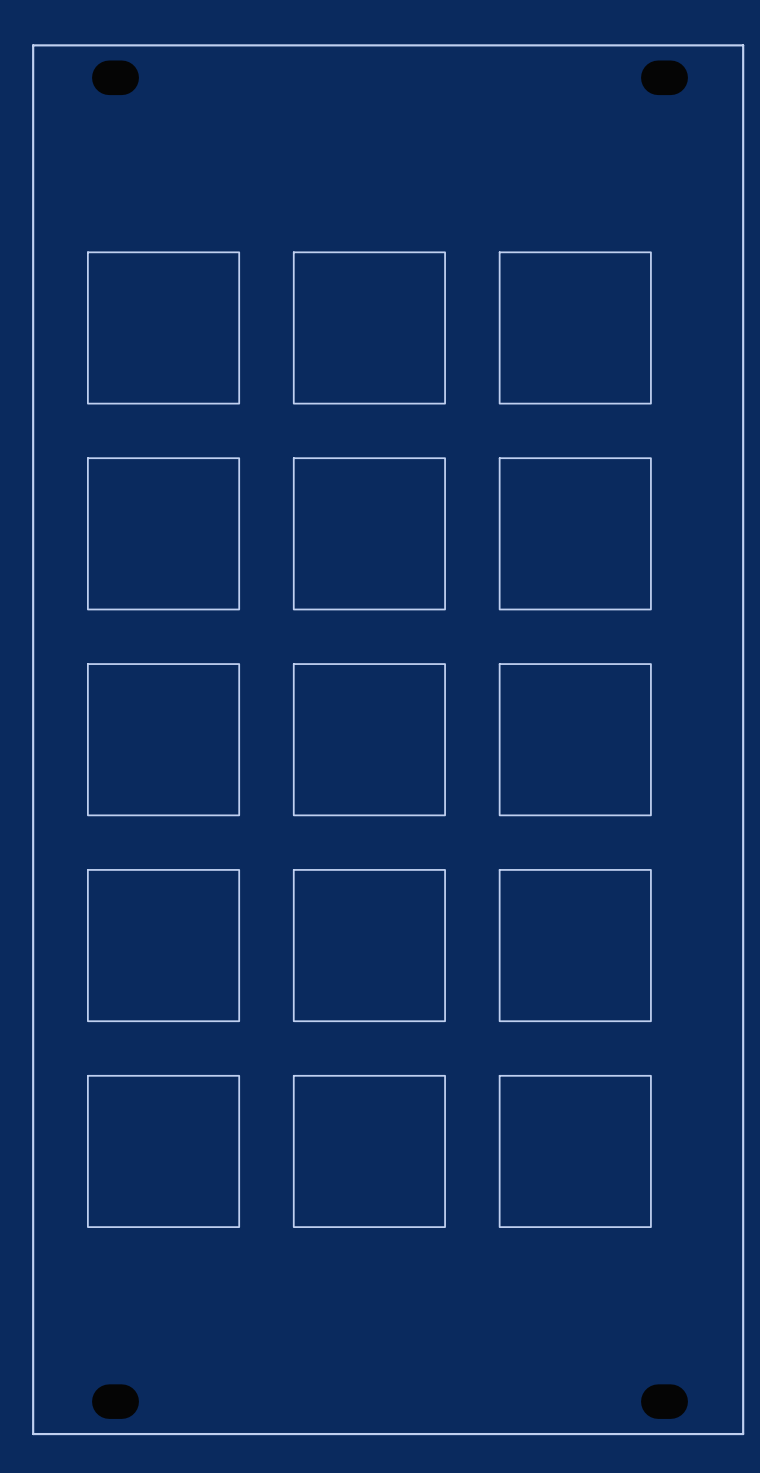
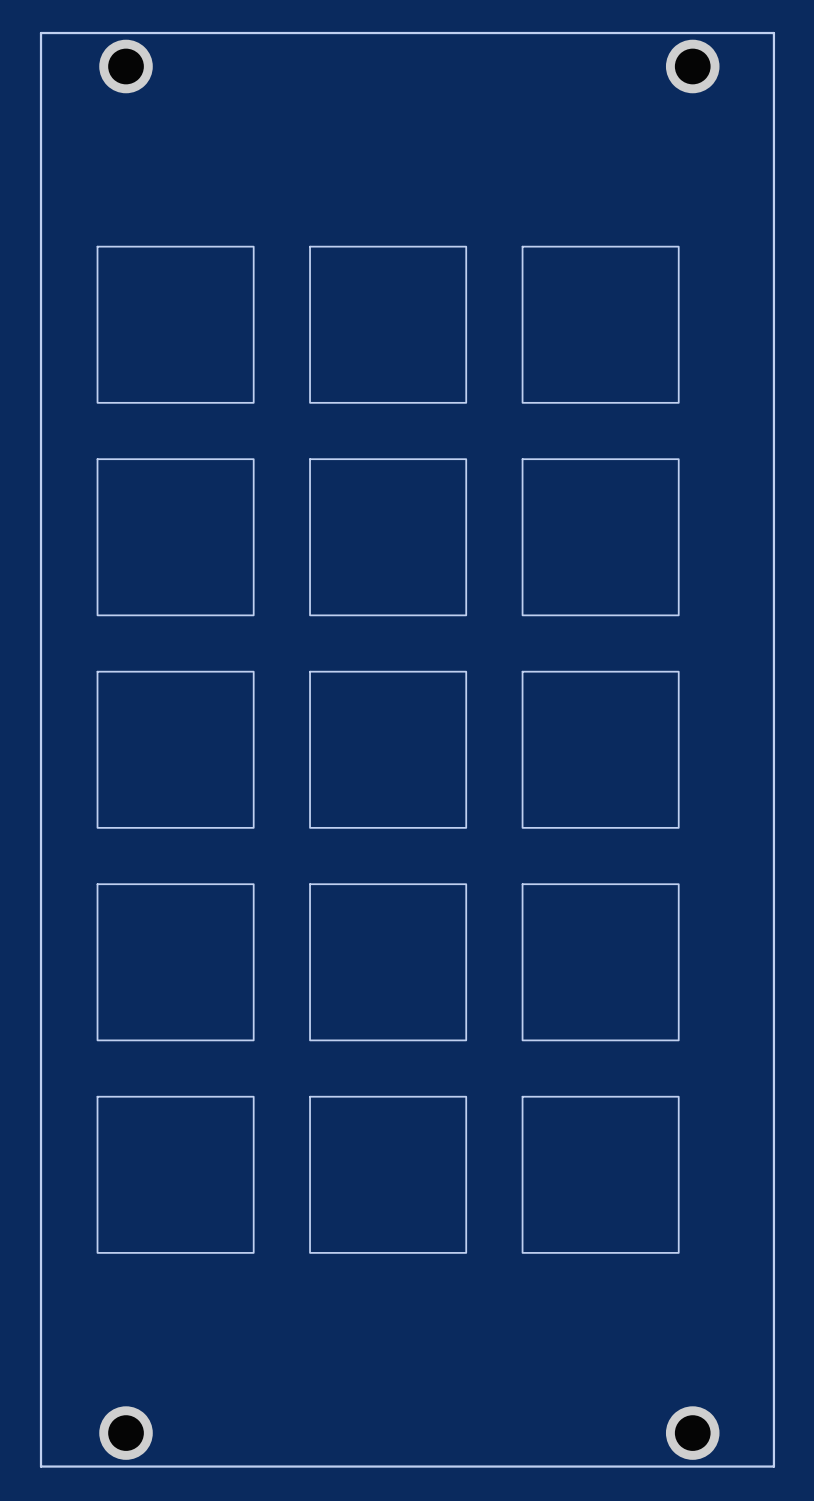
part footprint: [92, 60, 139, 96] -> [99, 39, 153, 94]
part footprint: [641, 60, 688, 96] -> [665, 39, 720, 94]
part footprint: [92, 1384, 139, 1419] -> [99, 1406, 153, 1460]
part footprint: [641, 1384, 688, 1419] -> [665, 1406, 720, 1460]

